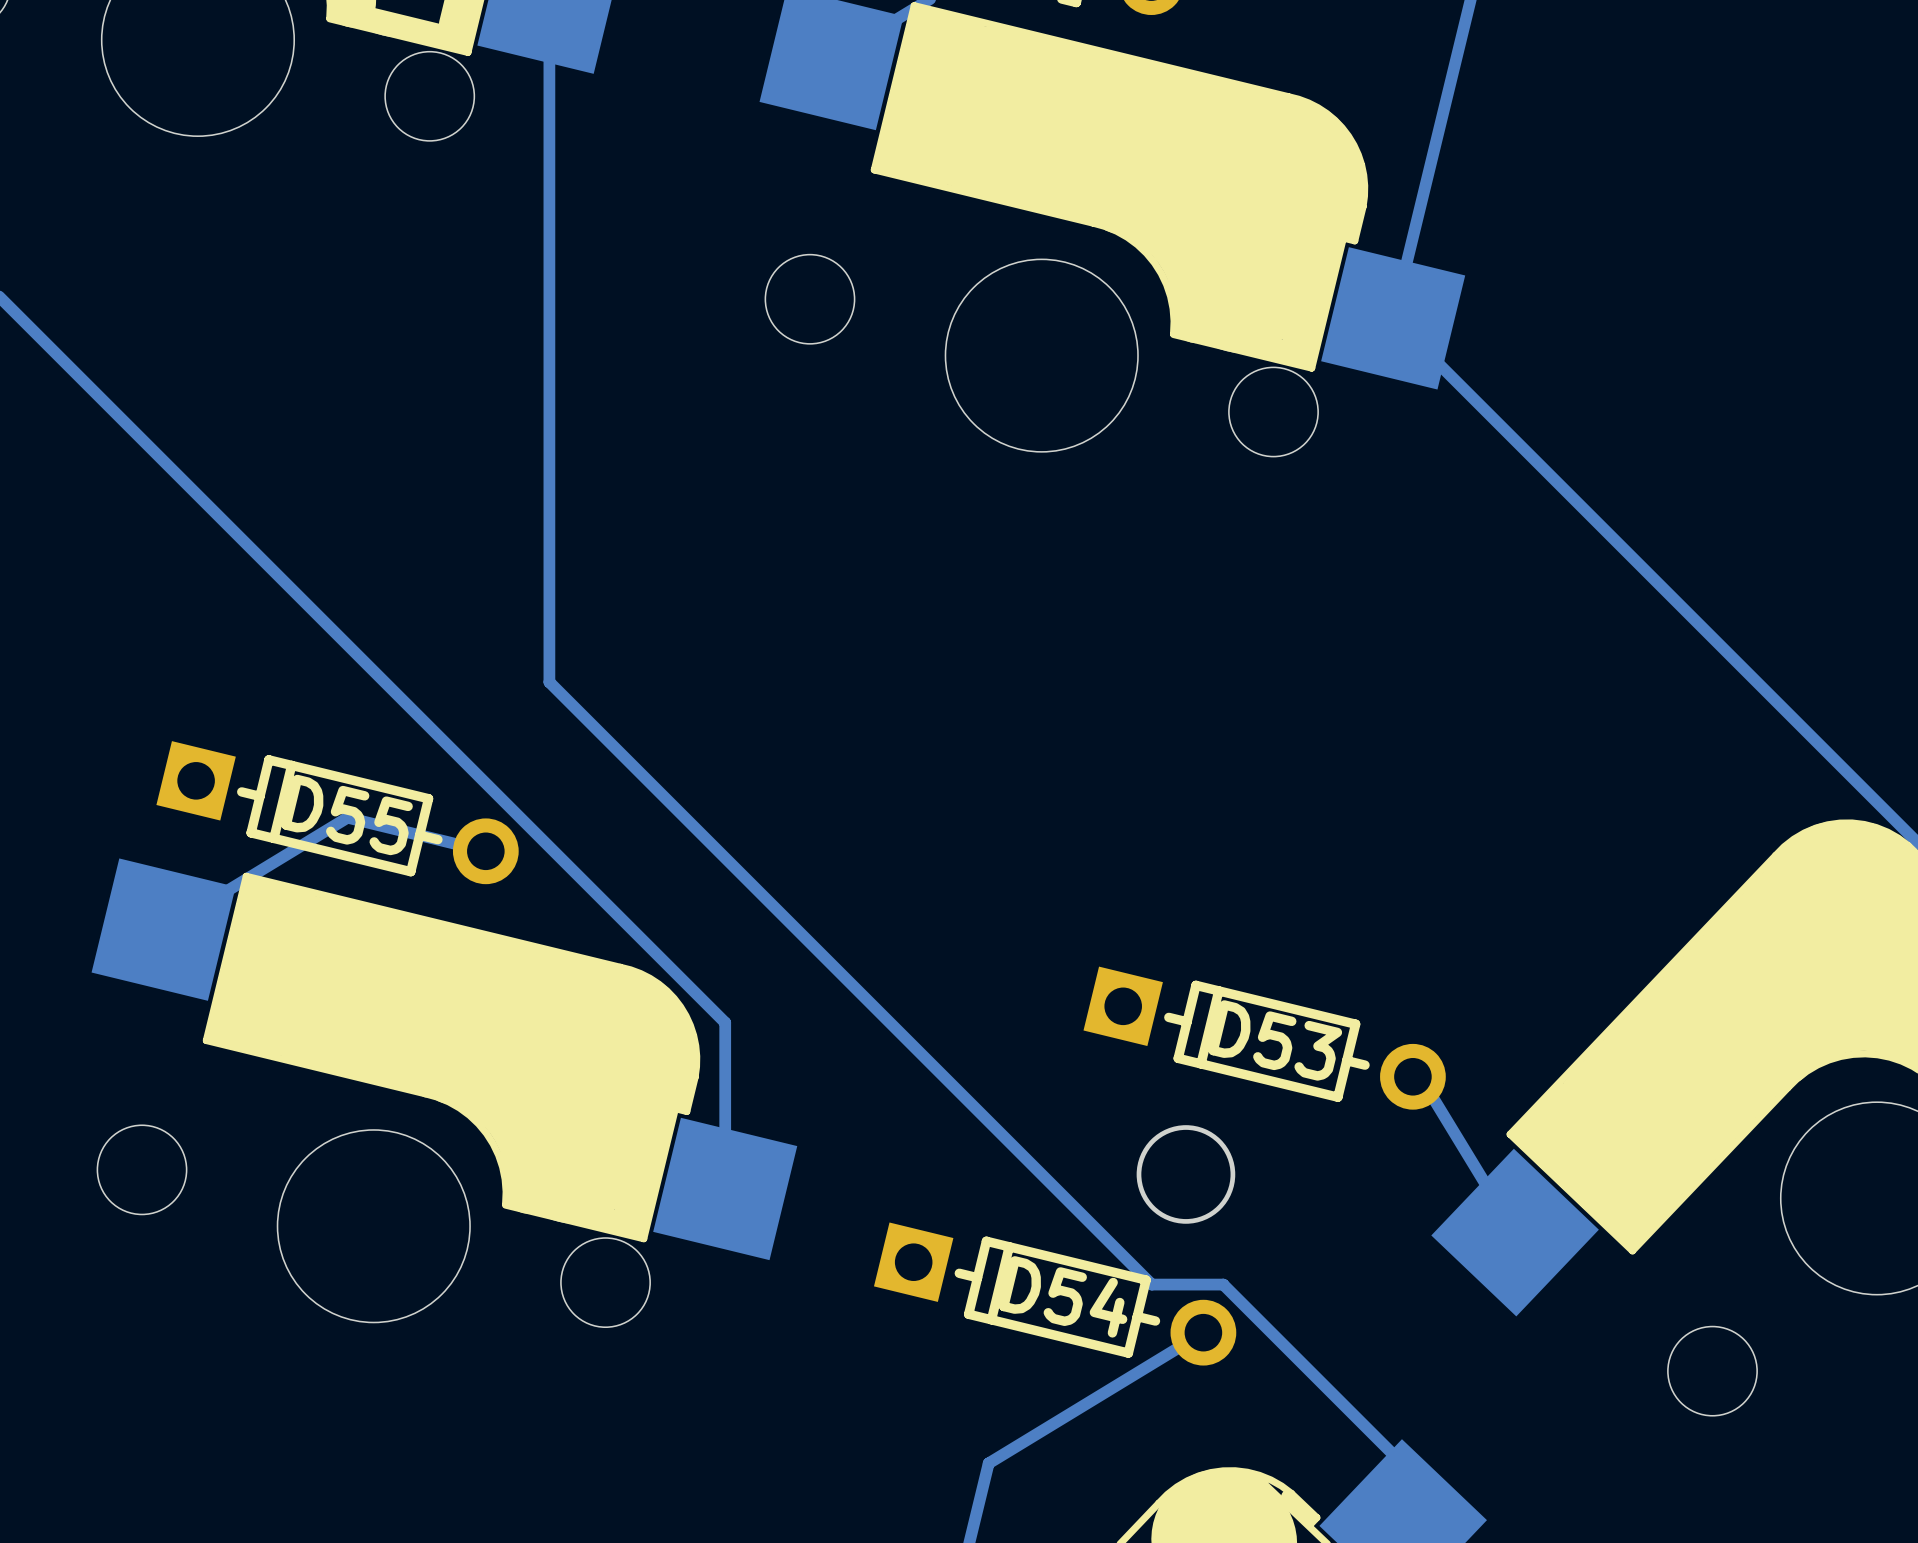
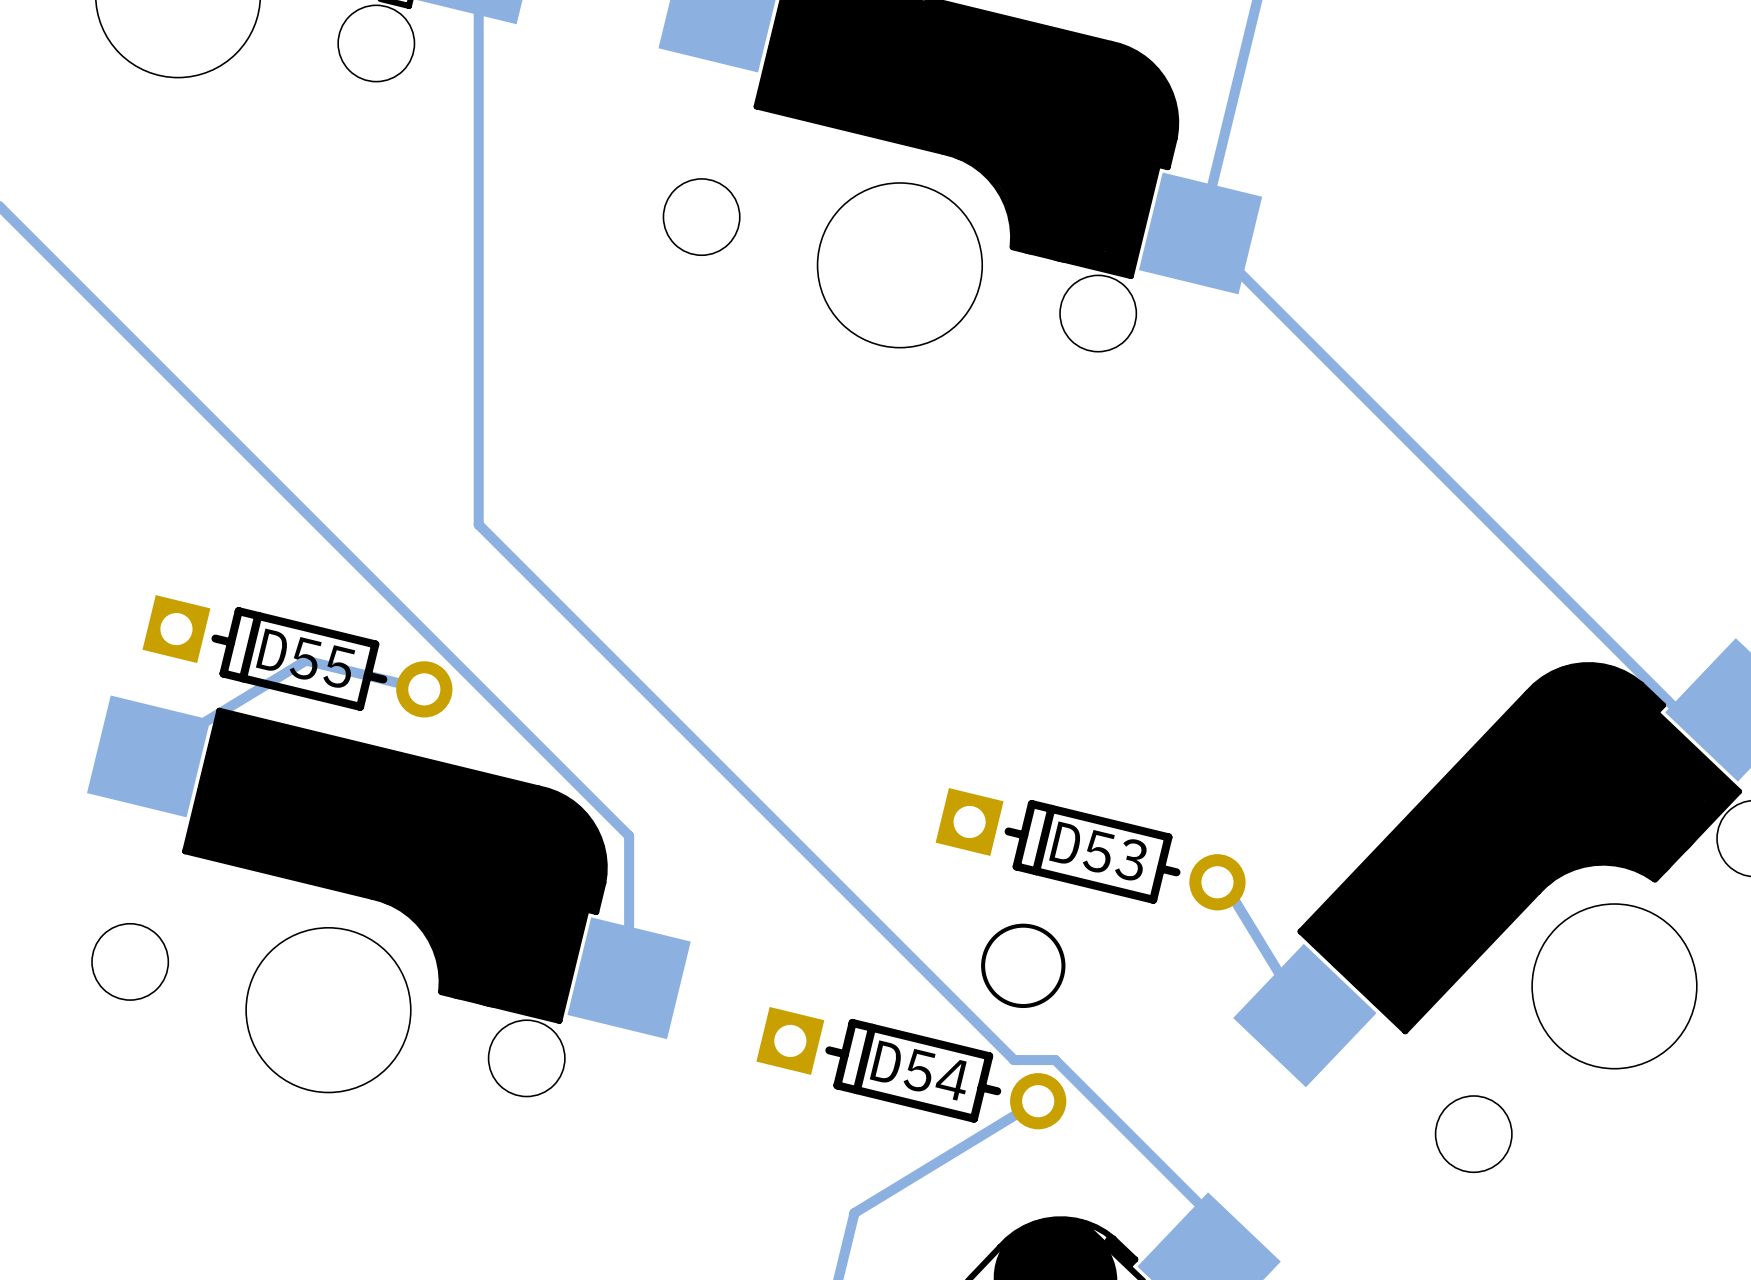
track: (549, 658) (549, 682) (1151, 1284) (1175, 1284) -> (478, 524) (1014, 1060)

